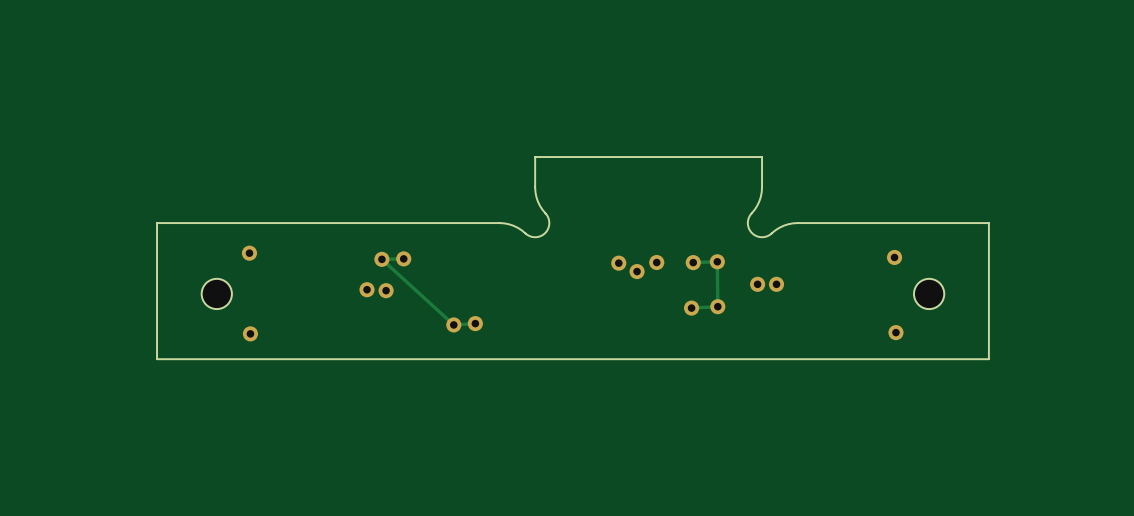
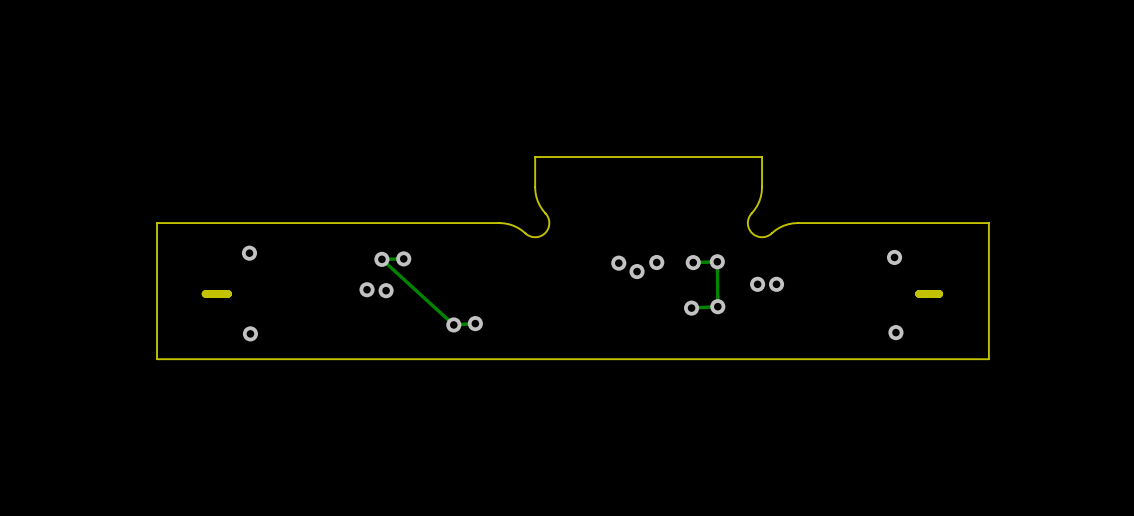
board edge: none -> (205, 293) (228, 293) (205, 293)
part: (216, 293) -> none
board edge: none -> (918, 293) (939, 293) (918, 293)
part: (929, 293) -> none

